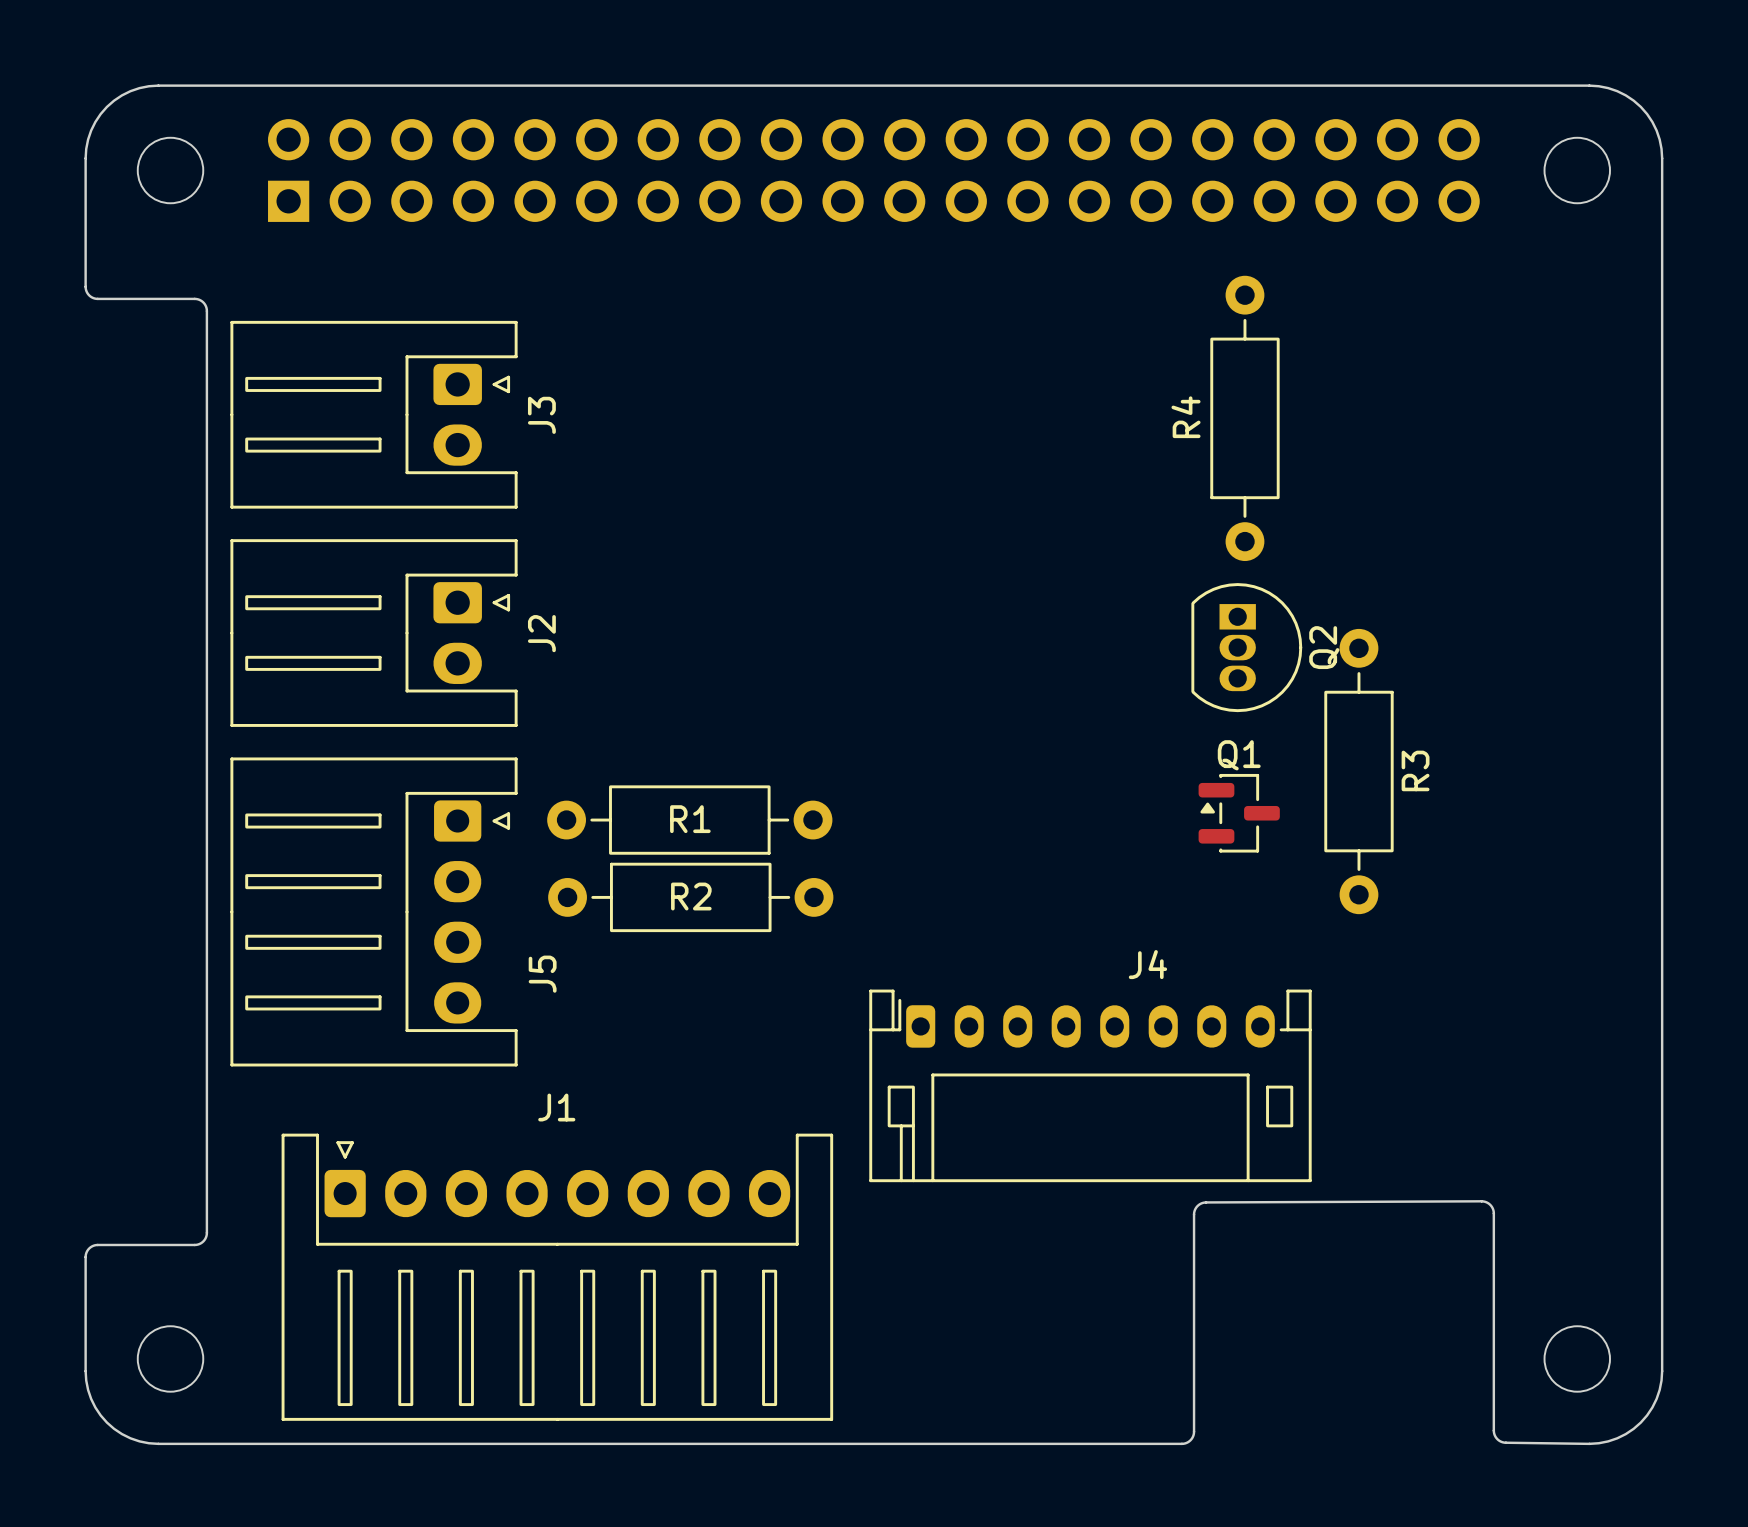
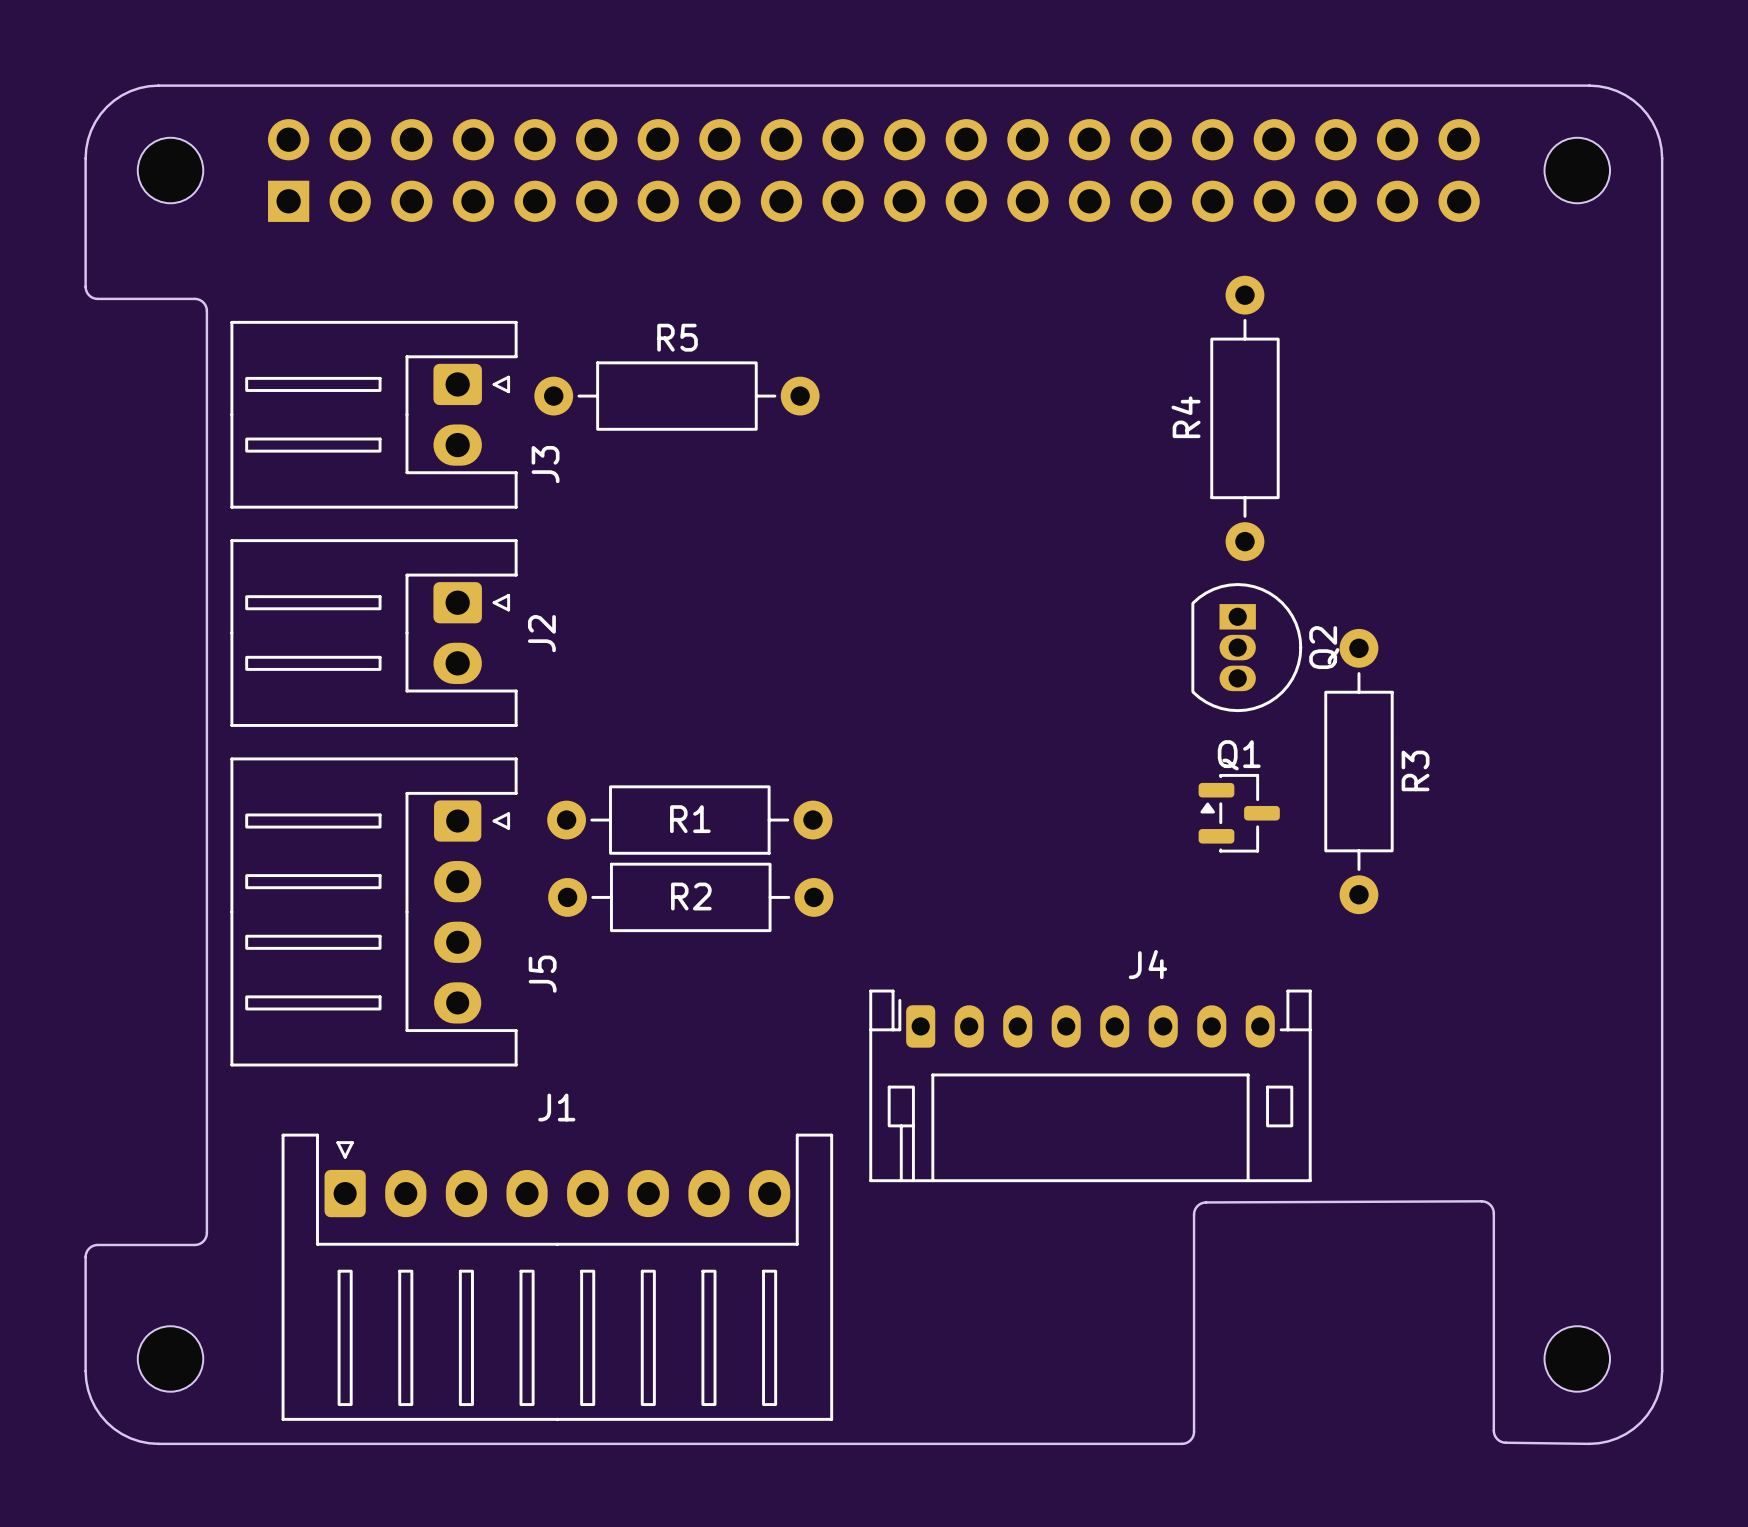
R5: none -> (676, 396)
J3 name position: J3 (541, 415) -> J3 (545, 464)

